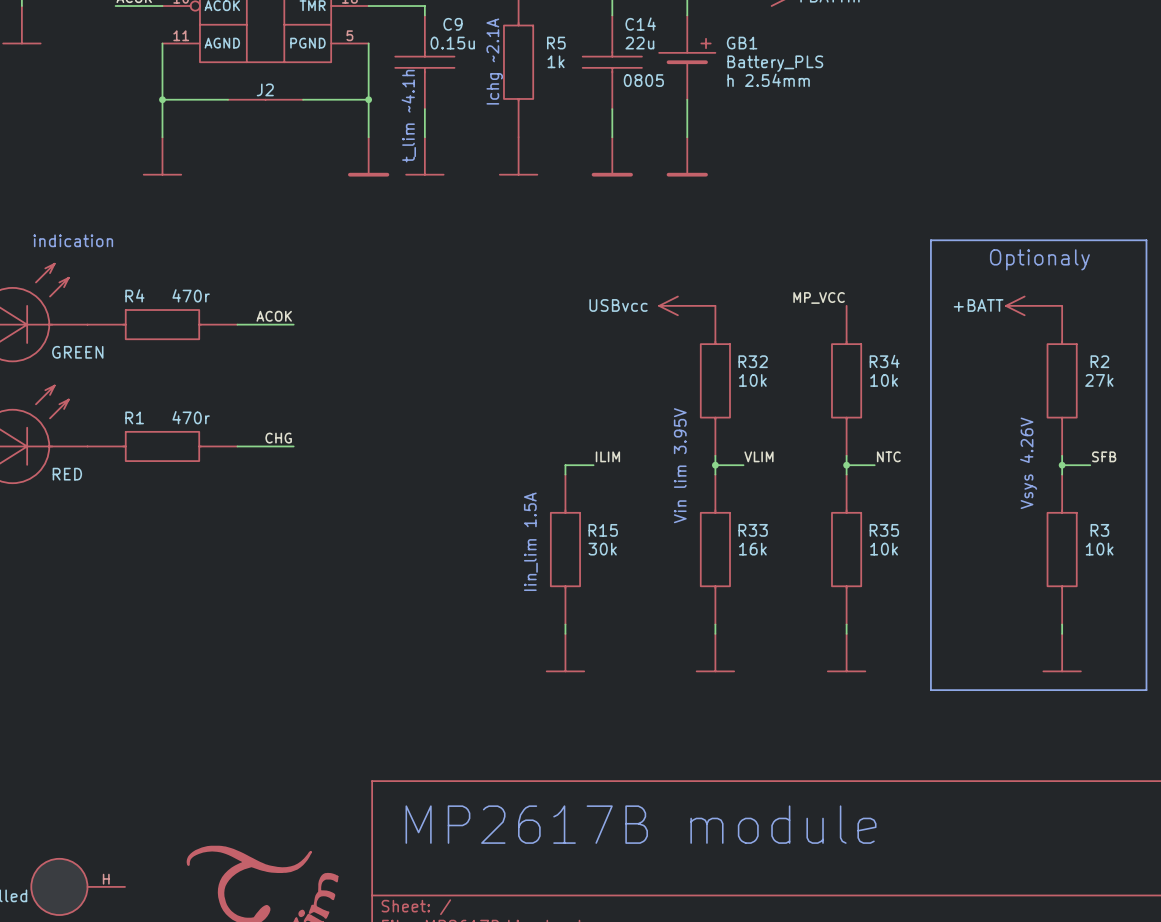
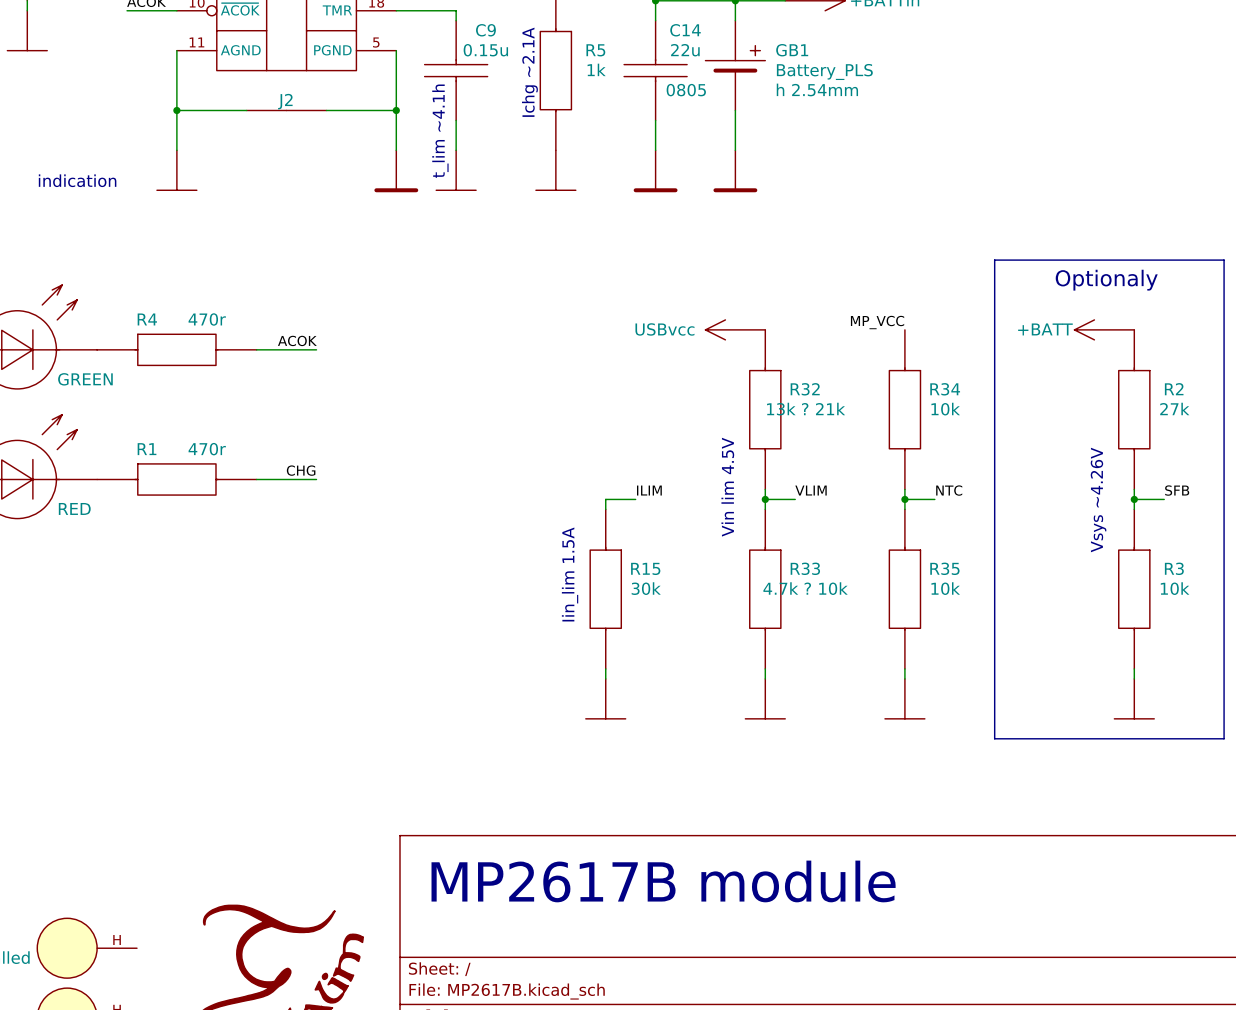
text position: indication (73, 240) -> indication (77, 180)
R32 value: 10k (752, 380) -> 13k ? 21k (806, 409)
text: Vsys 4.26V (1028, 463) -> Vsys ~4.26V (1098, 500)
text: Vin lim 3.95V (680, 465) -> Vin lim 4.5V (727, 487)
R33 value: 16k (752, 549) -> 4.7k ? 10k (805, 588)

